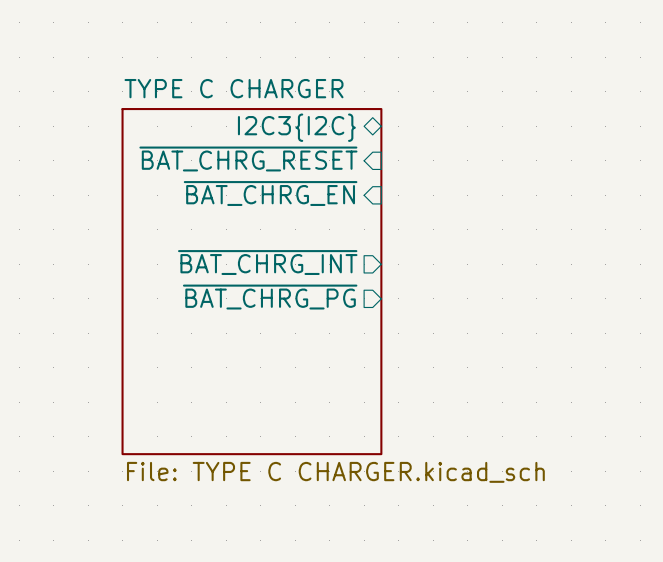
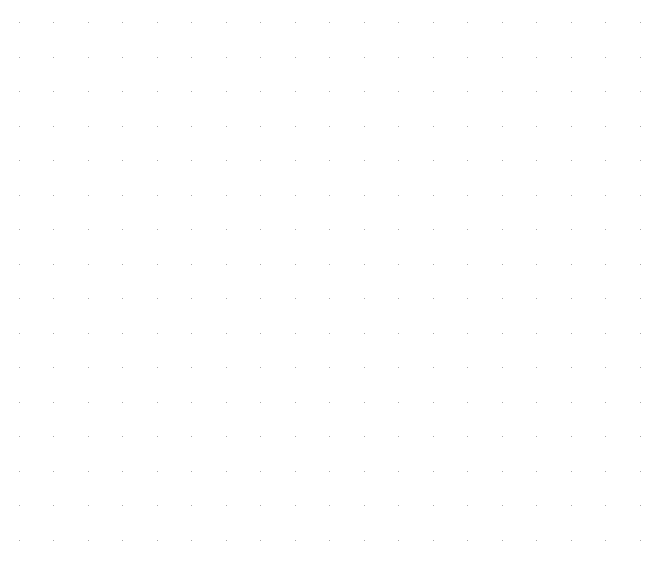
sheet pin: I2C3{I2C} (296, 127) -> none
sheet pin: ~{BAT_CHRG_RESET} (248, 159) -> none
sheet pin: ~{BAT_CHRG_EN} (270, 193) -> none
sheet pin: ~{BAT_CHRG_INT} (267, 262) -> none
sheet TYPE C CHARGER: File: TYPE C CHARGER.kicad_sch (251, 281) -> none
sheet pin: ~{BAT_CHRG_PG} (270, 297) -> none

